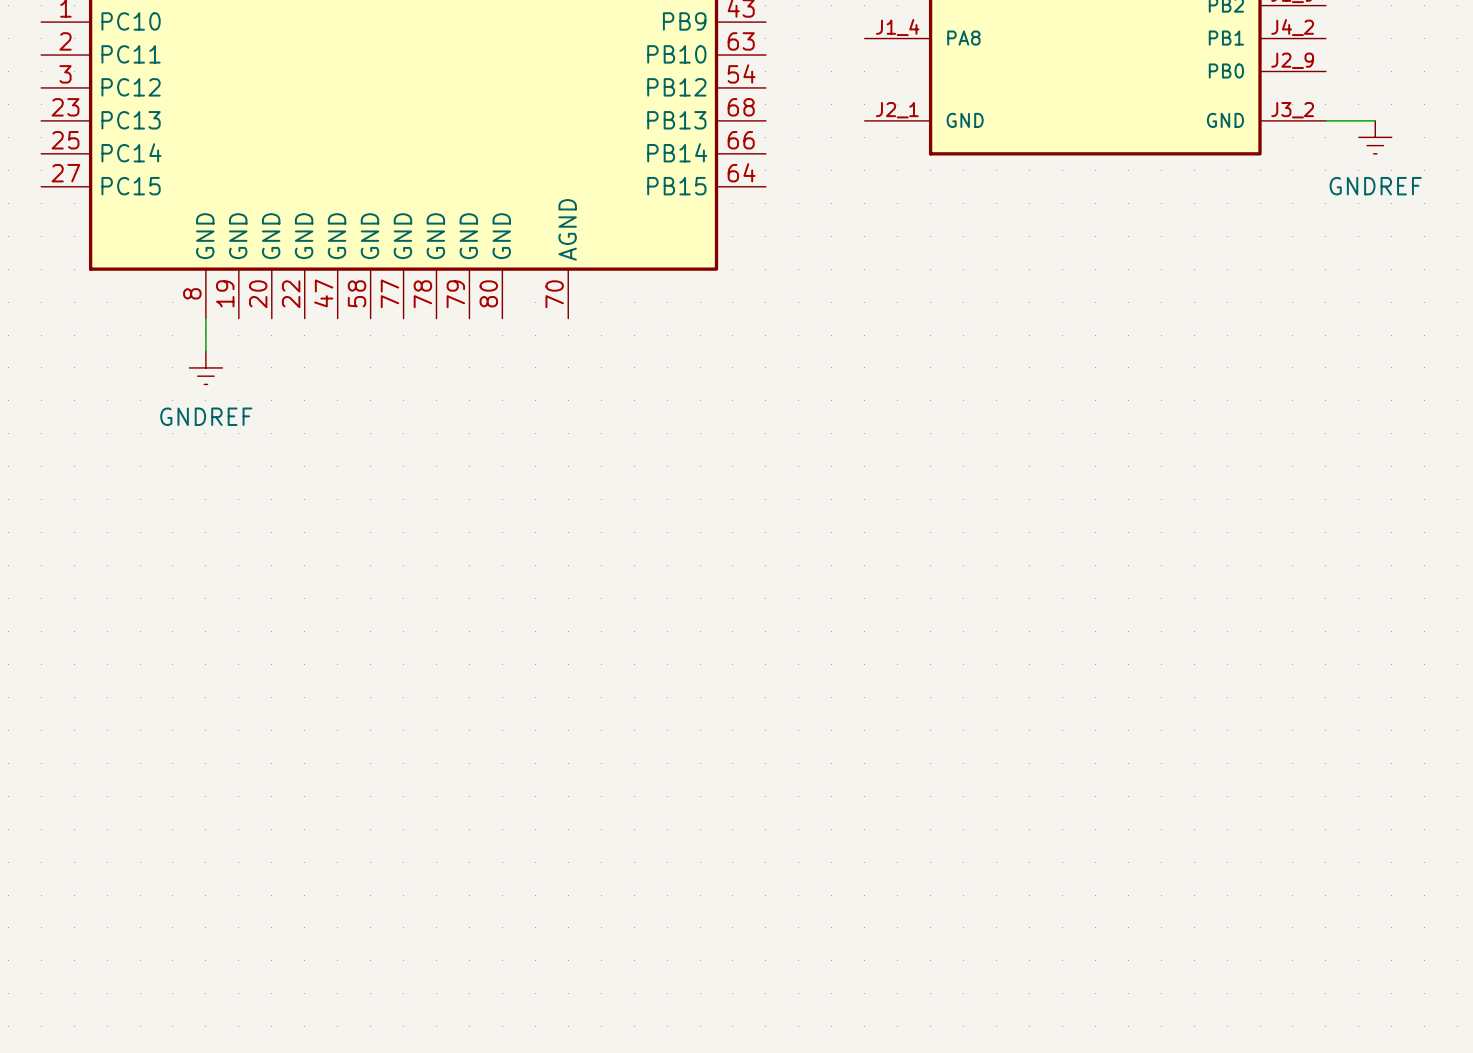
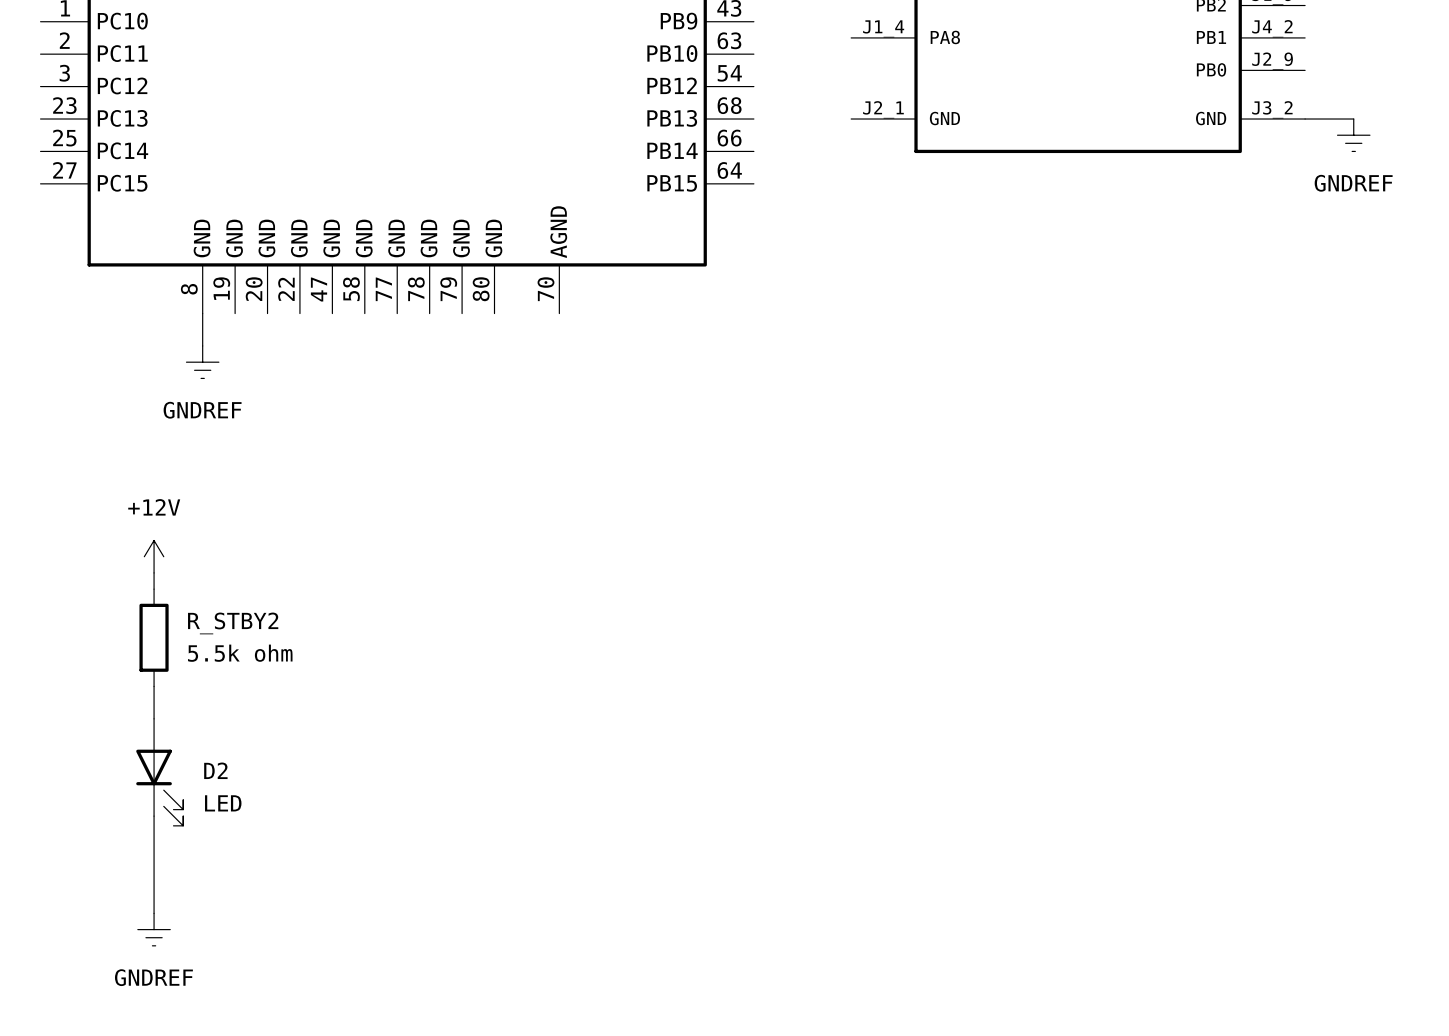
power symbol: none -> +12V (154, 556)
wire: none -> (154, 572) (154, 589)
R_STBY2: none -> 5.5k ohm (154, 637)
wire: none -> (154, 686) (154, 718)
D2: none -> LED (159, 772)
wire: none -> (154, 816) (154, 913)
power symbol: none -> GNDREF (154, 929)

